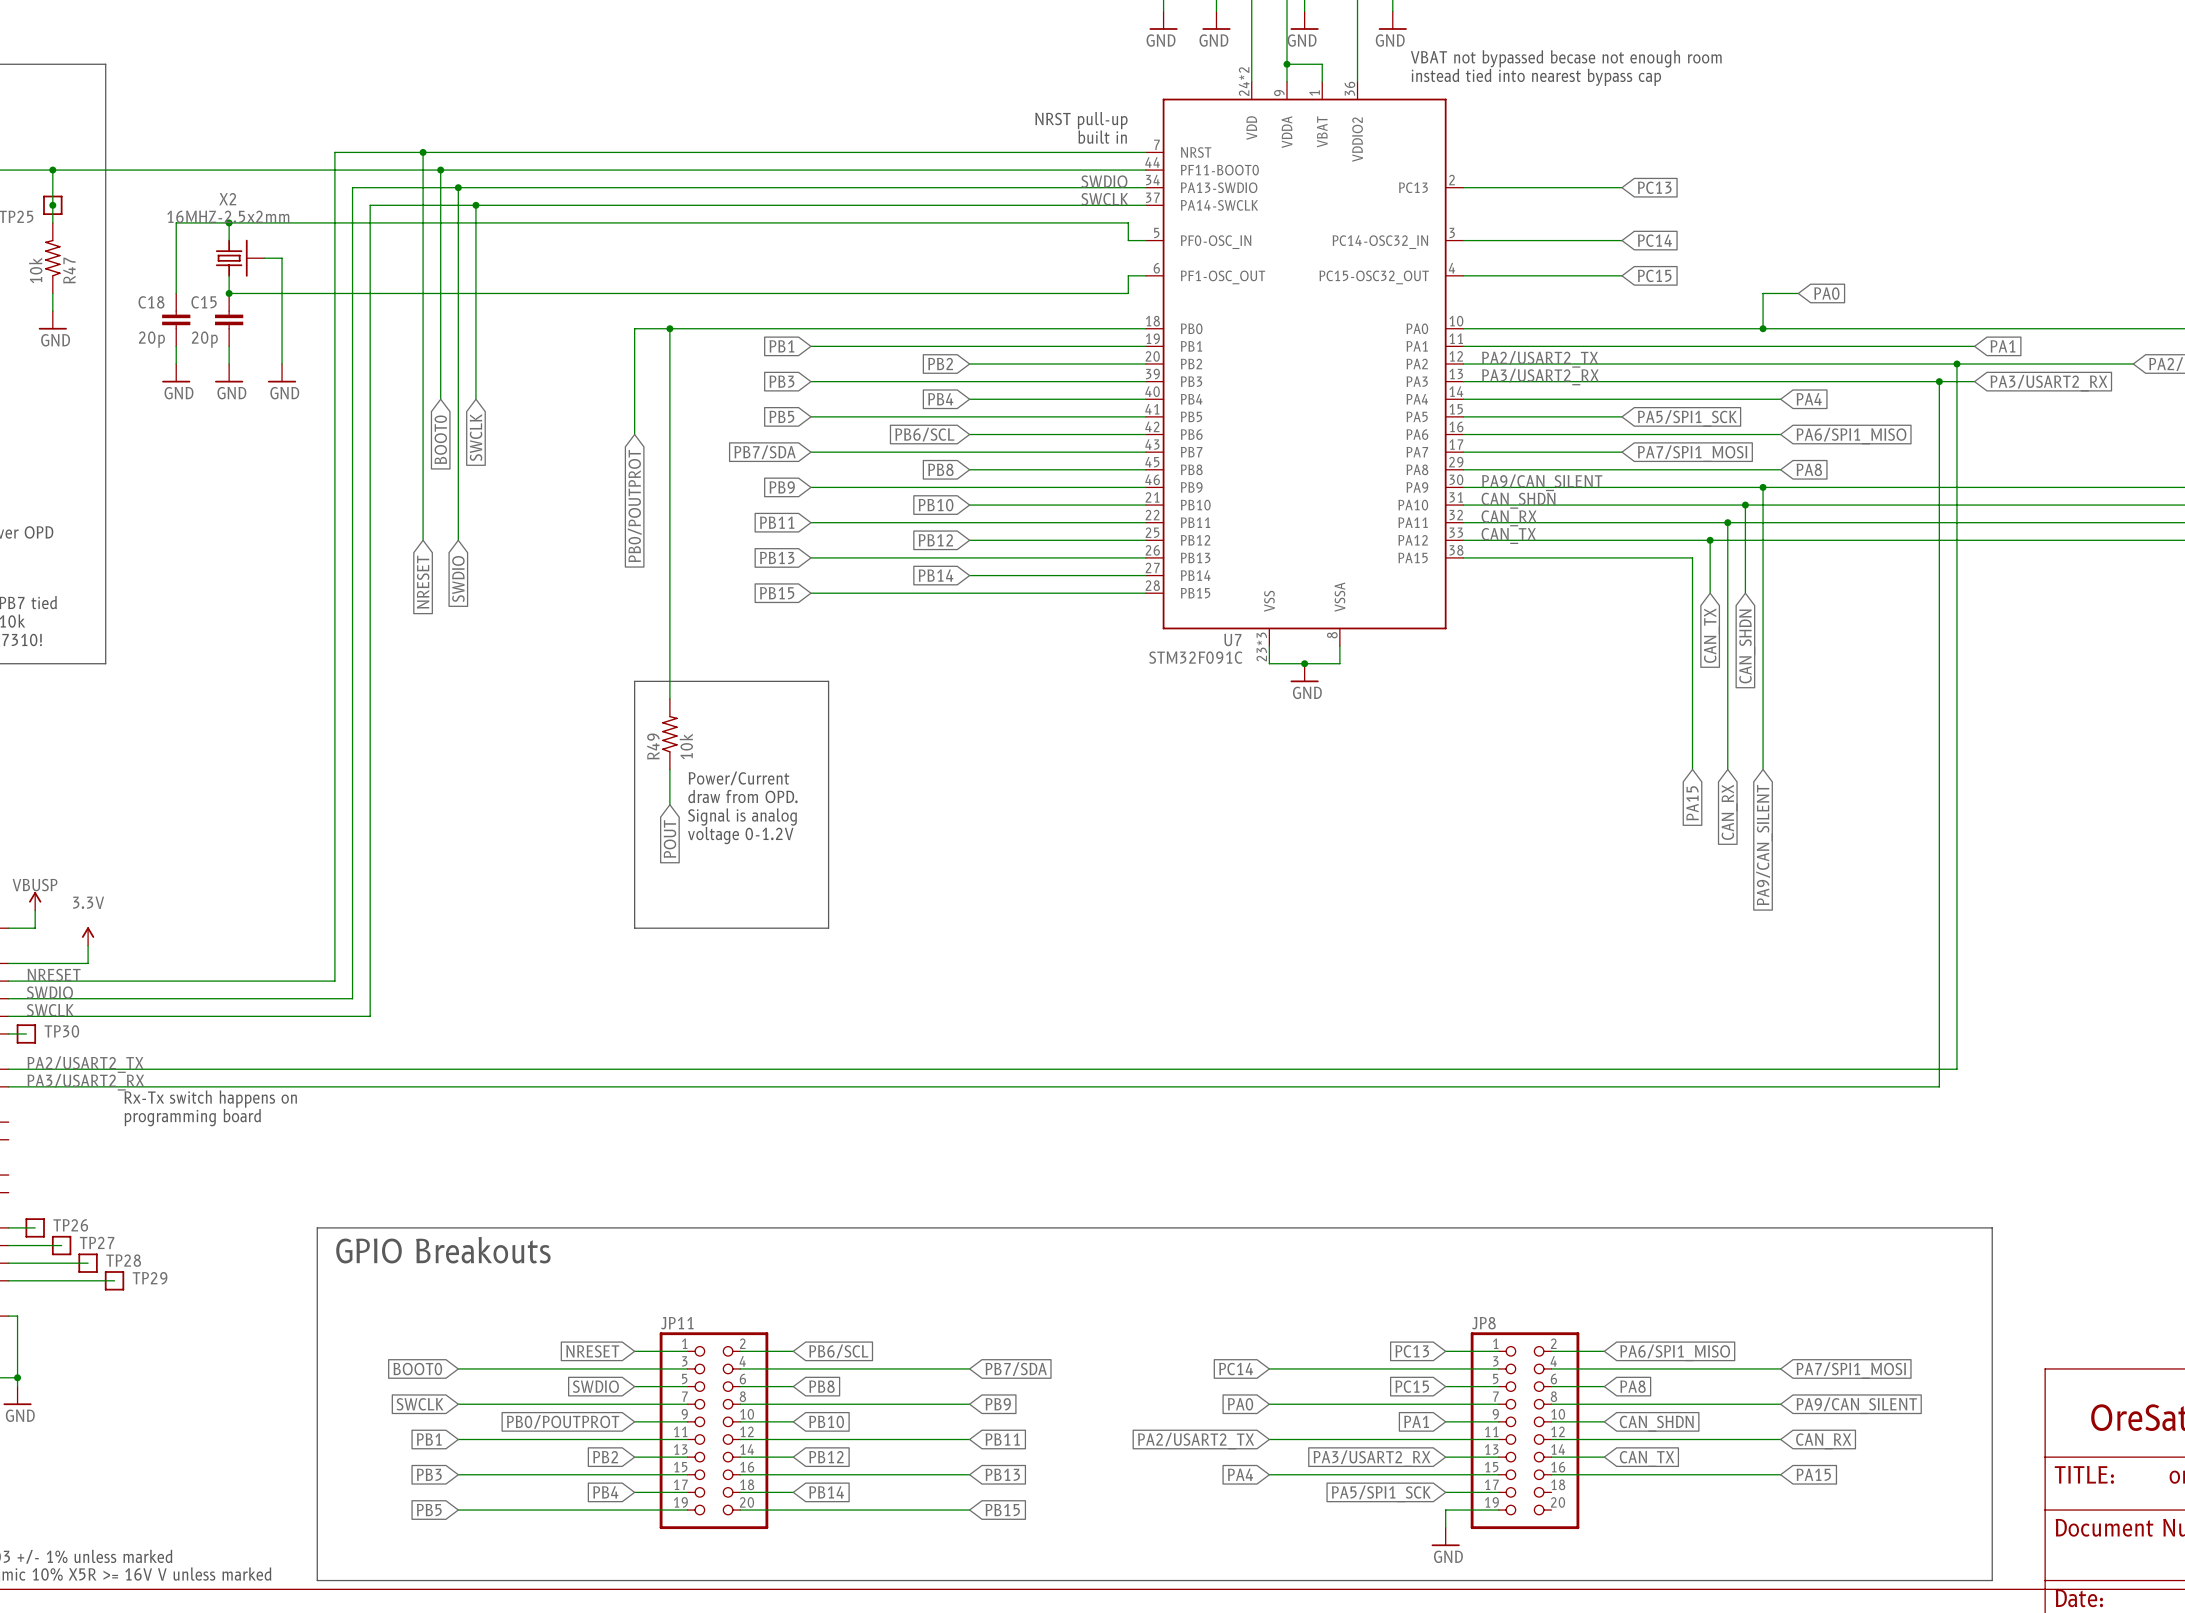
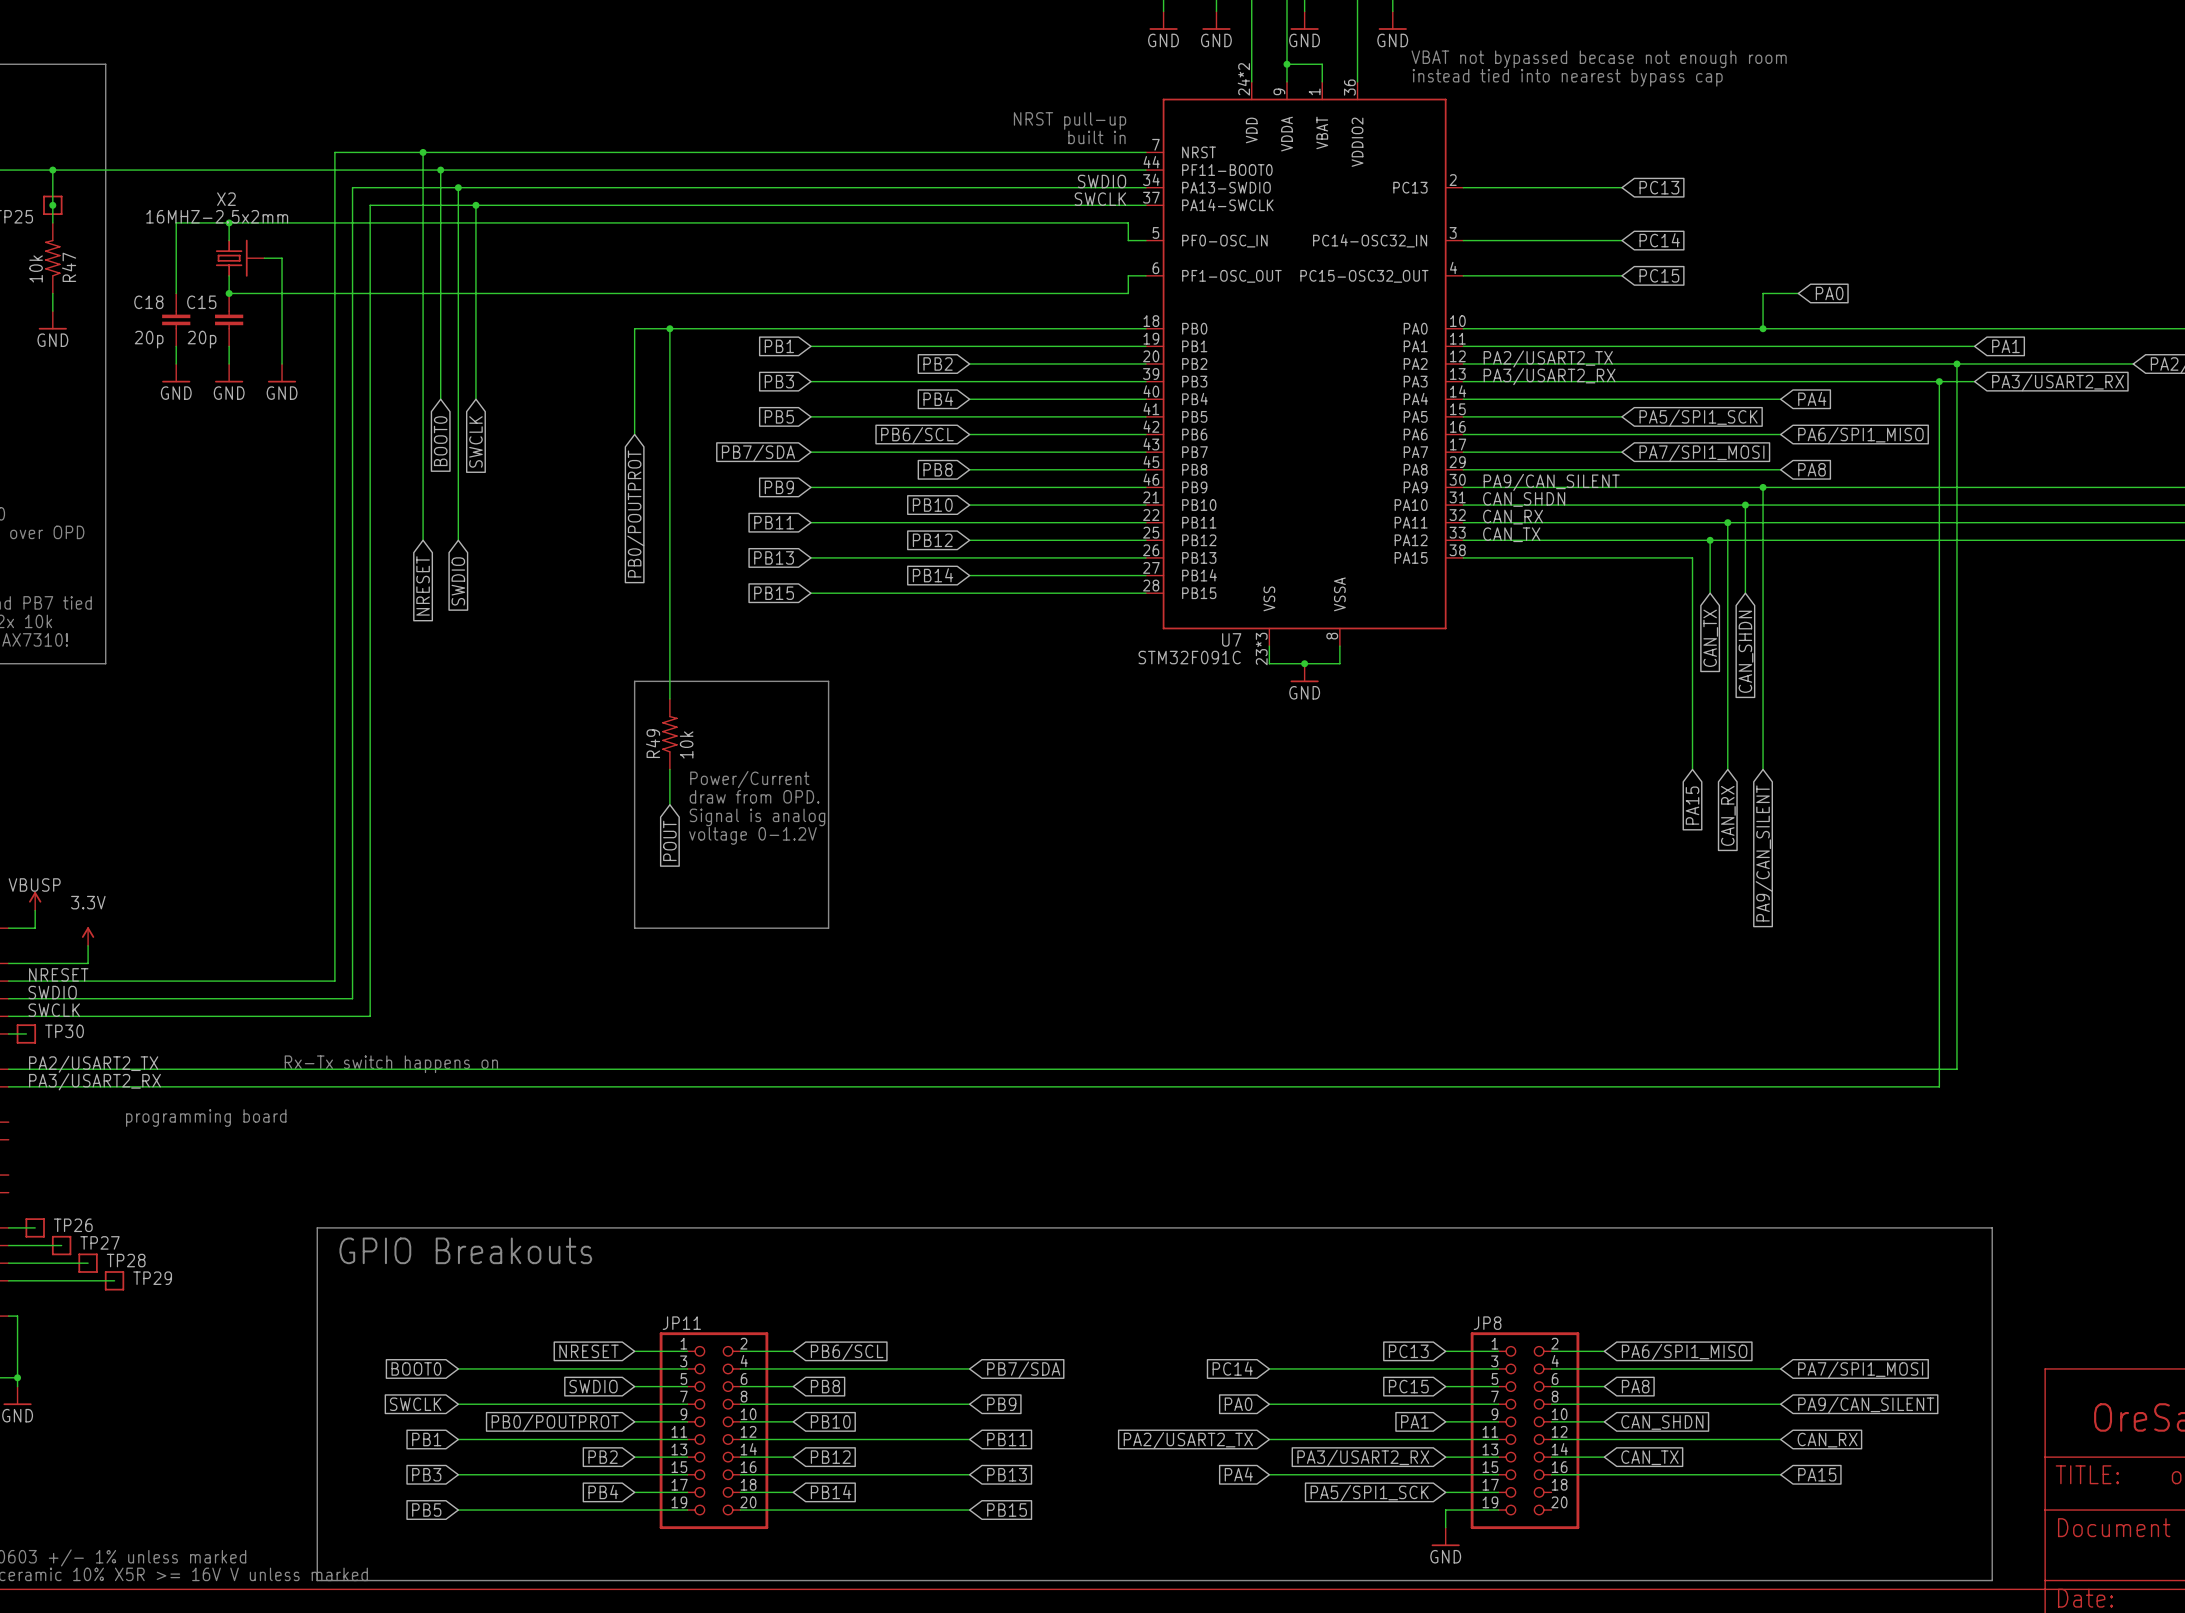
text position: Rx-Tx switch happens on (210, 1099) -> Rx-Tx switch happens on (391, 1064)

